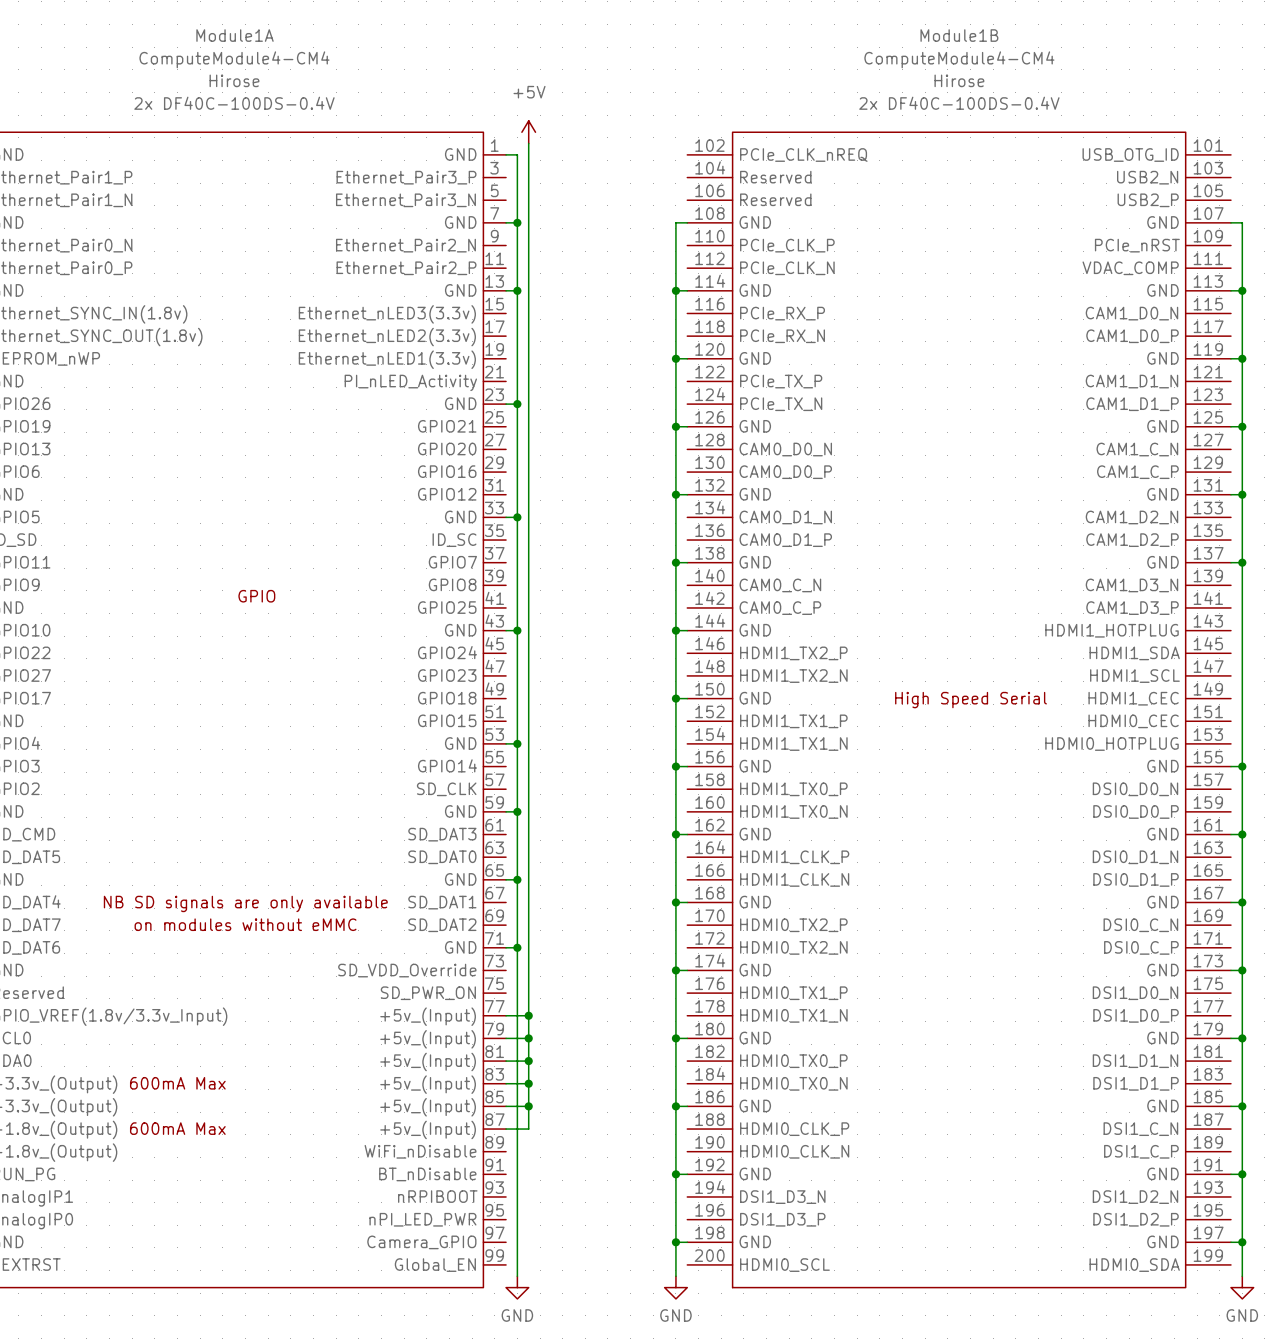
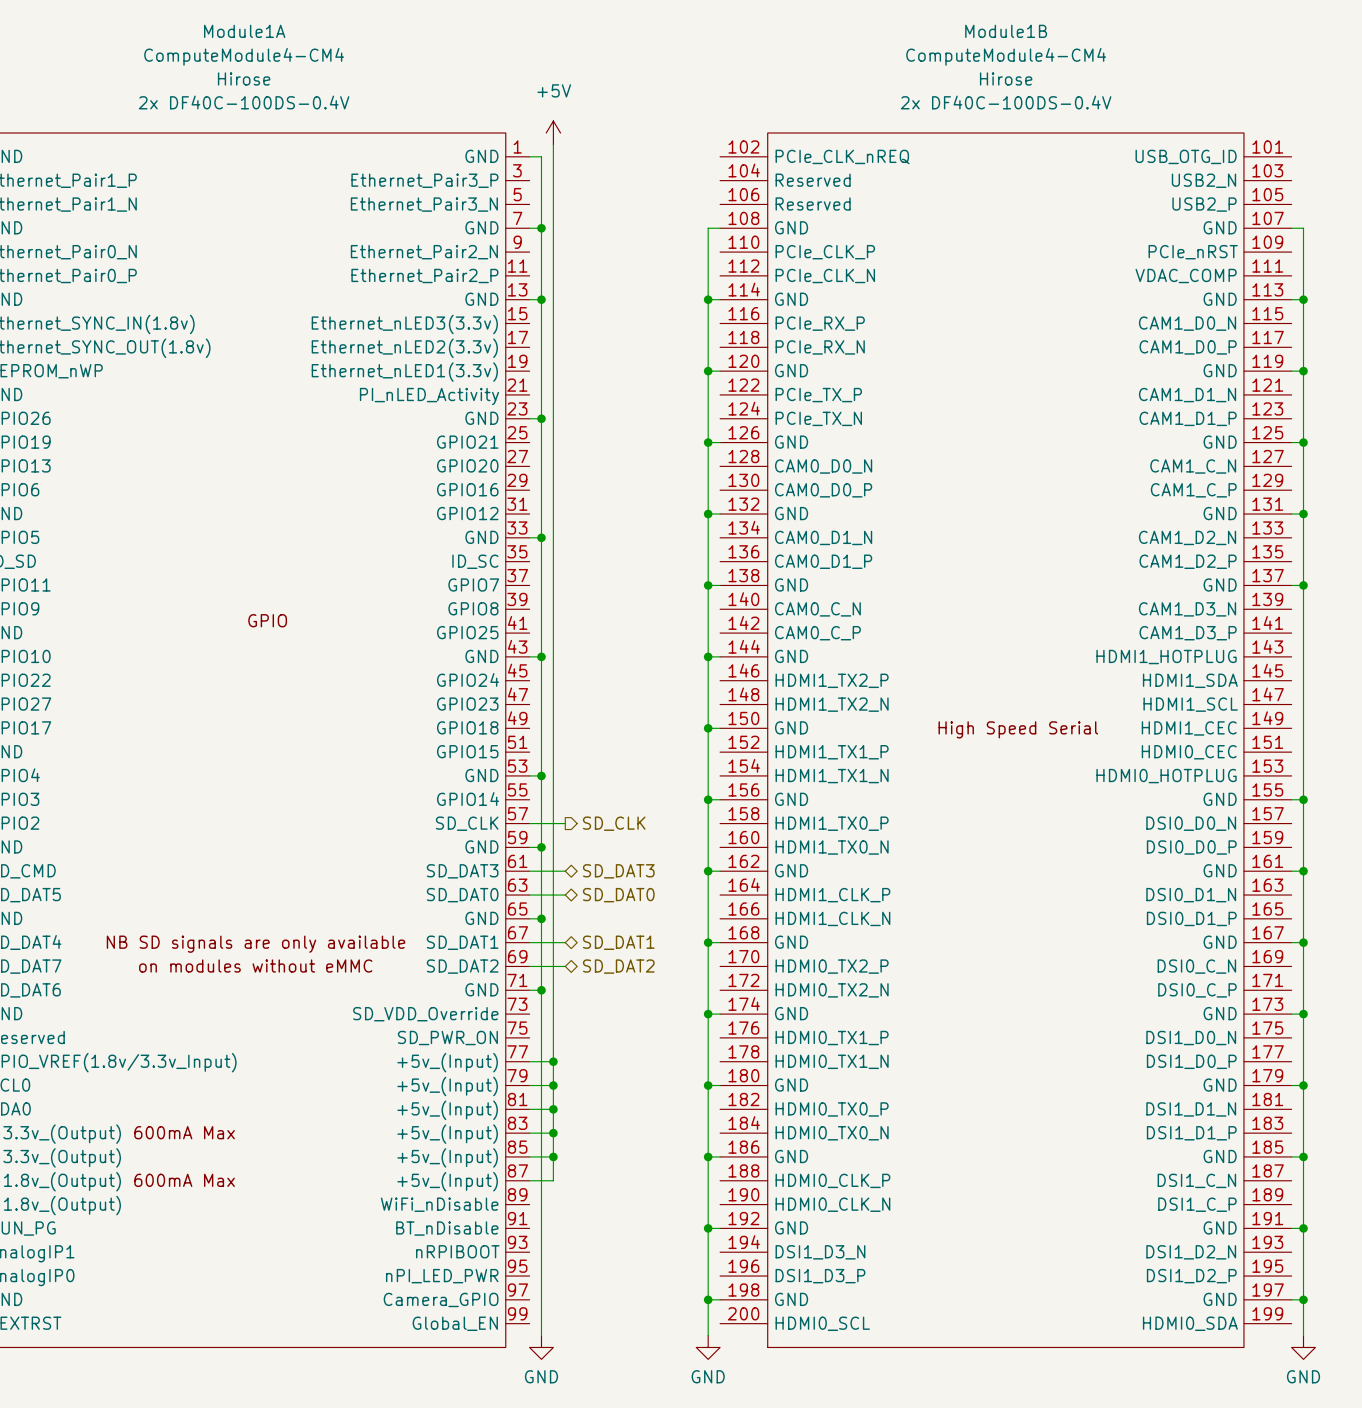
wire: none -> (529, 823) (565, 823)
hierarchical label: none -> SD_CLK (614, 823)
wire: none -> (529, 871) (565, 871)
hierarchical label: none -> SD_DAT3 (618, 871)
wire: none -> (529, 895) (565, 895)
hierarchical label: none -> SD_DAT0 (618, 895)
wire: none -> (529, 942) (565, 942)
hierarchical label: none -> SD_DAT1 (618, 942)
wire: none -> (529, 966) (565, 966)
hierarchical label: none -> SD_DAT2 (618, 966)

